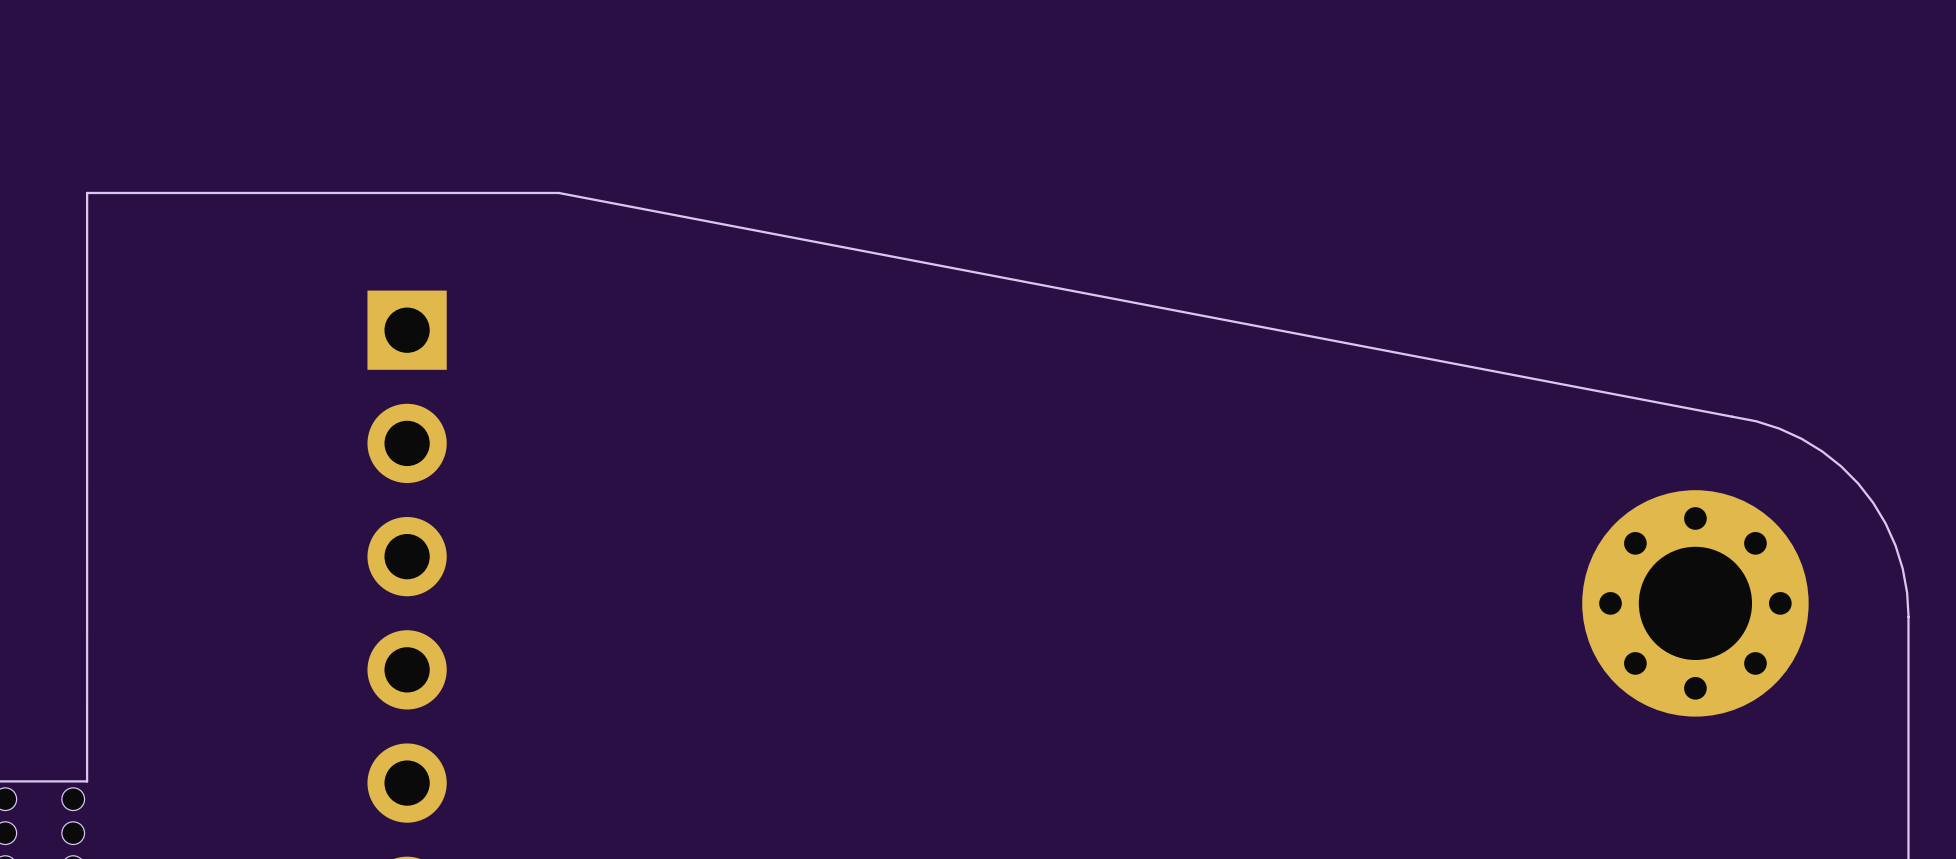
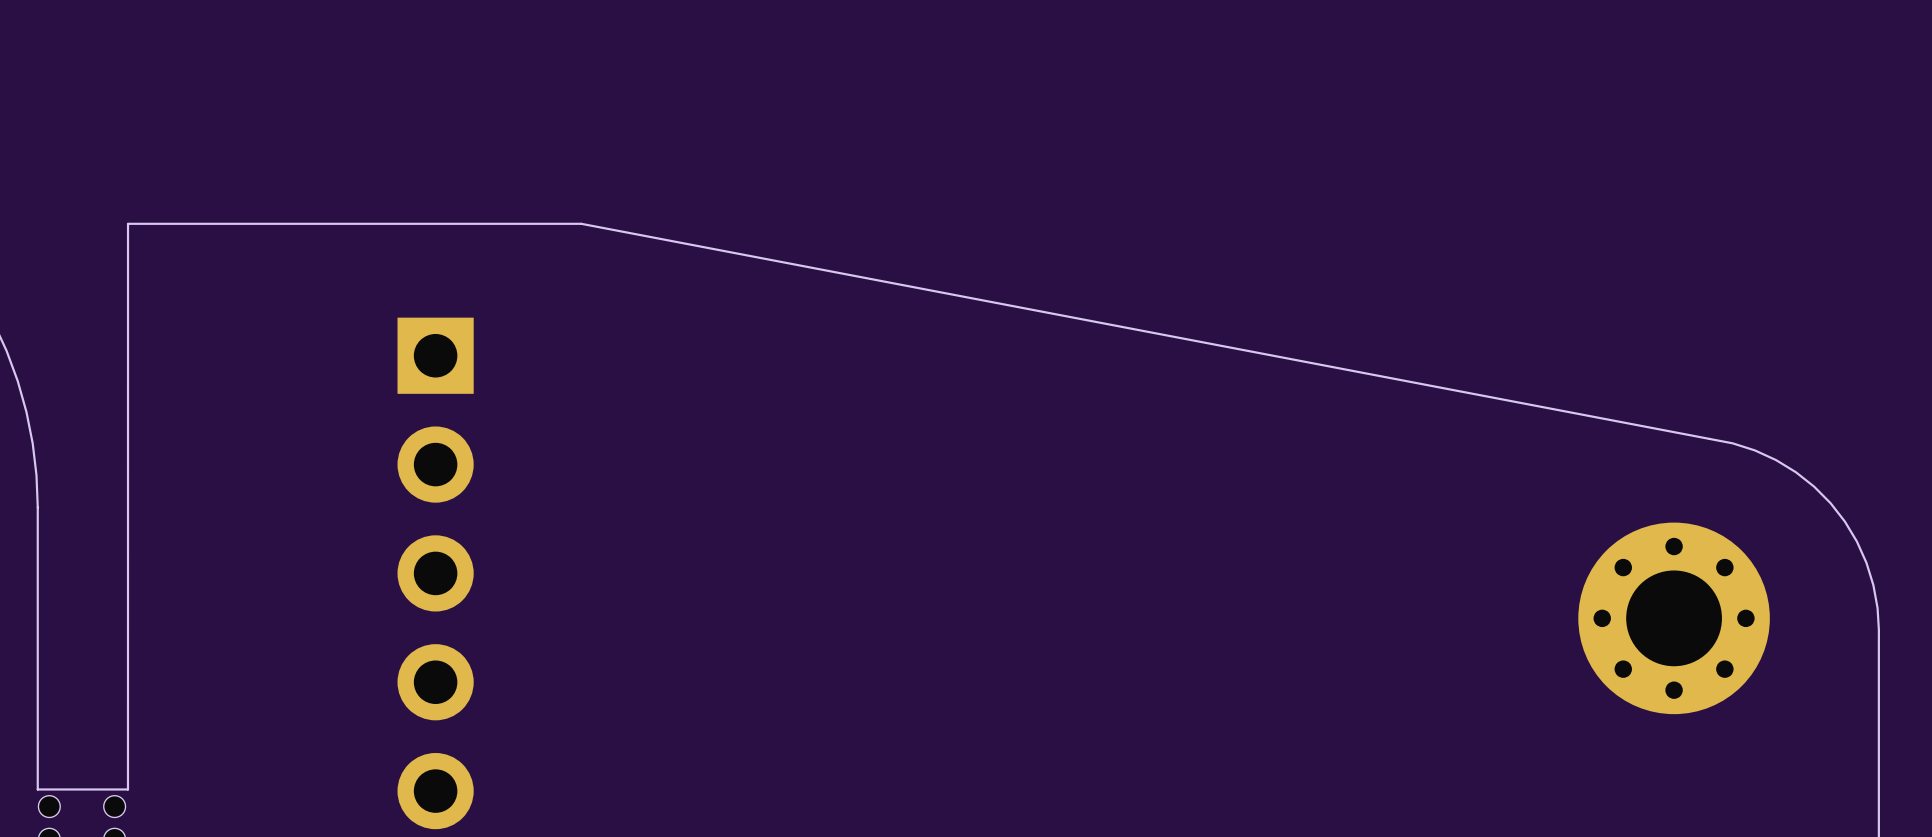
part footprint: [1582, 490, 1809, 717] -> [1578, 522, 1770, 715]

